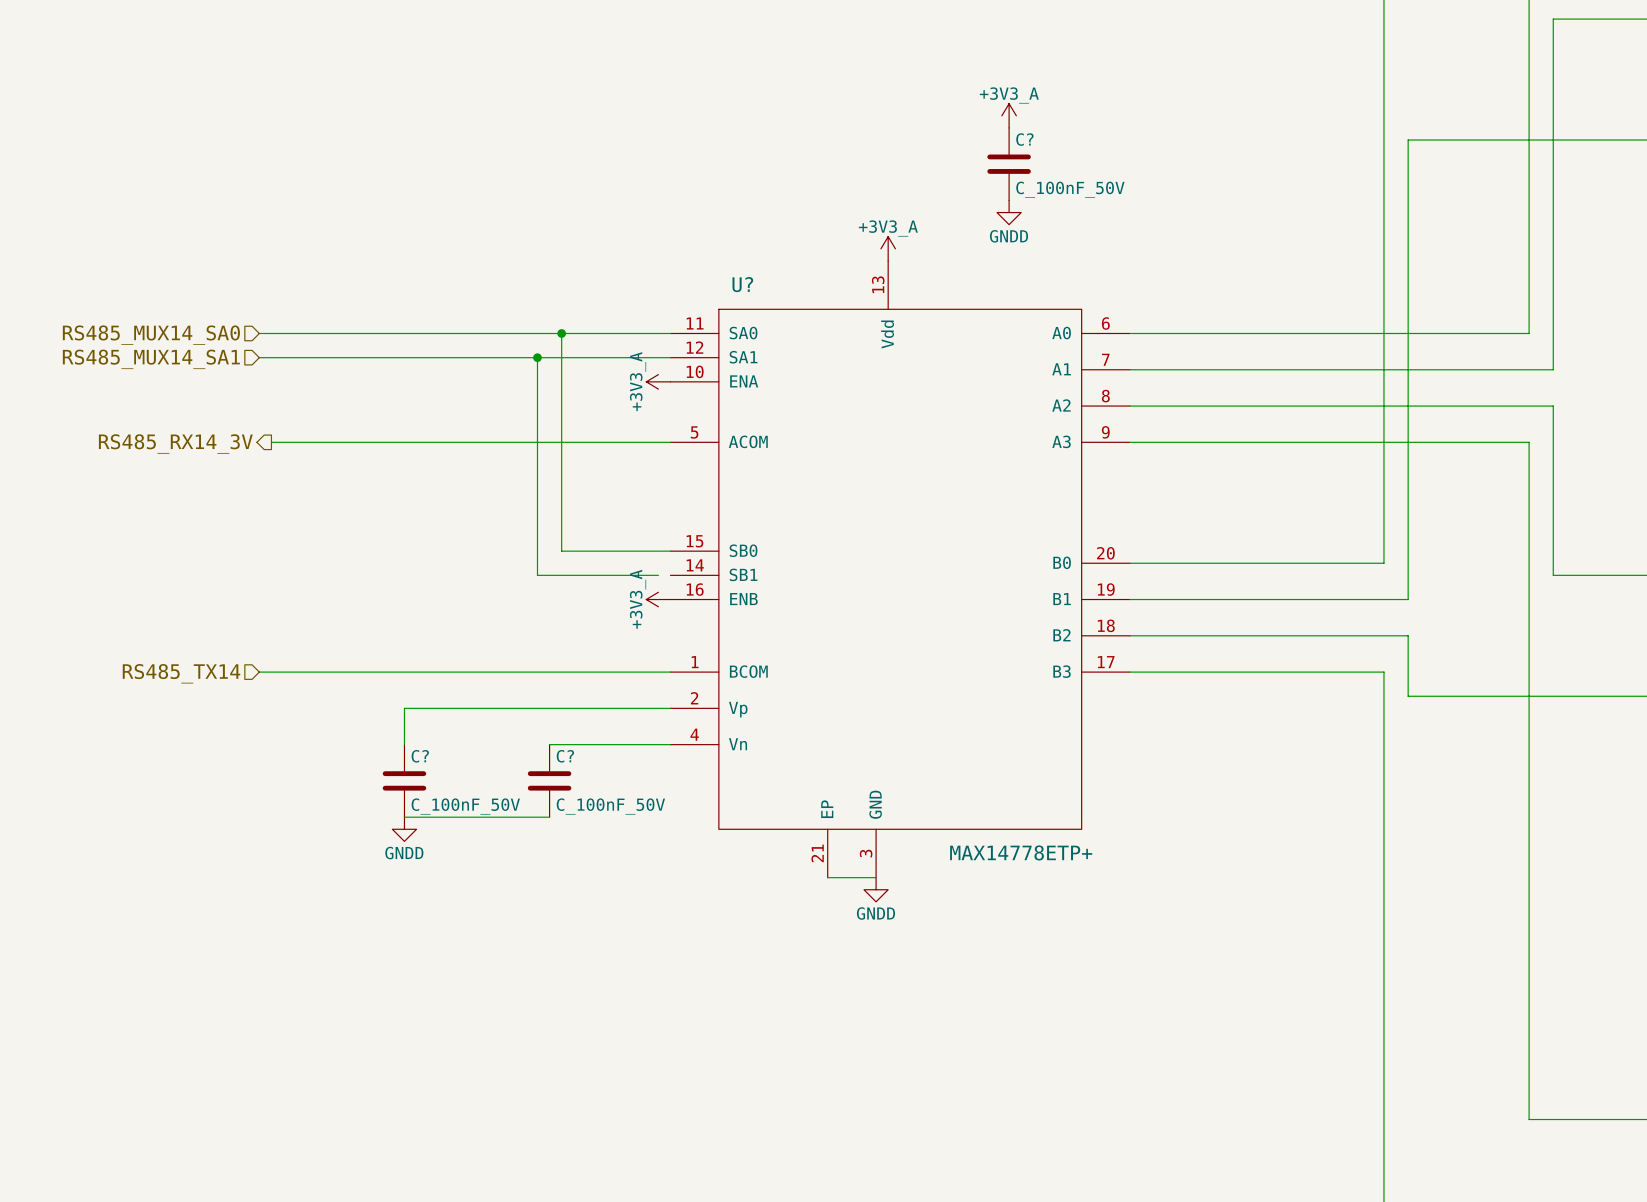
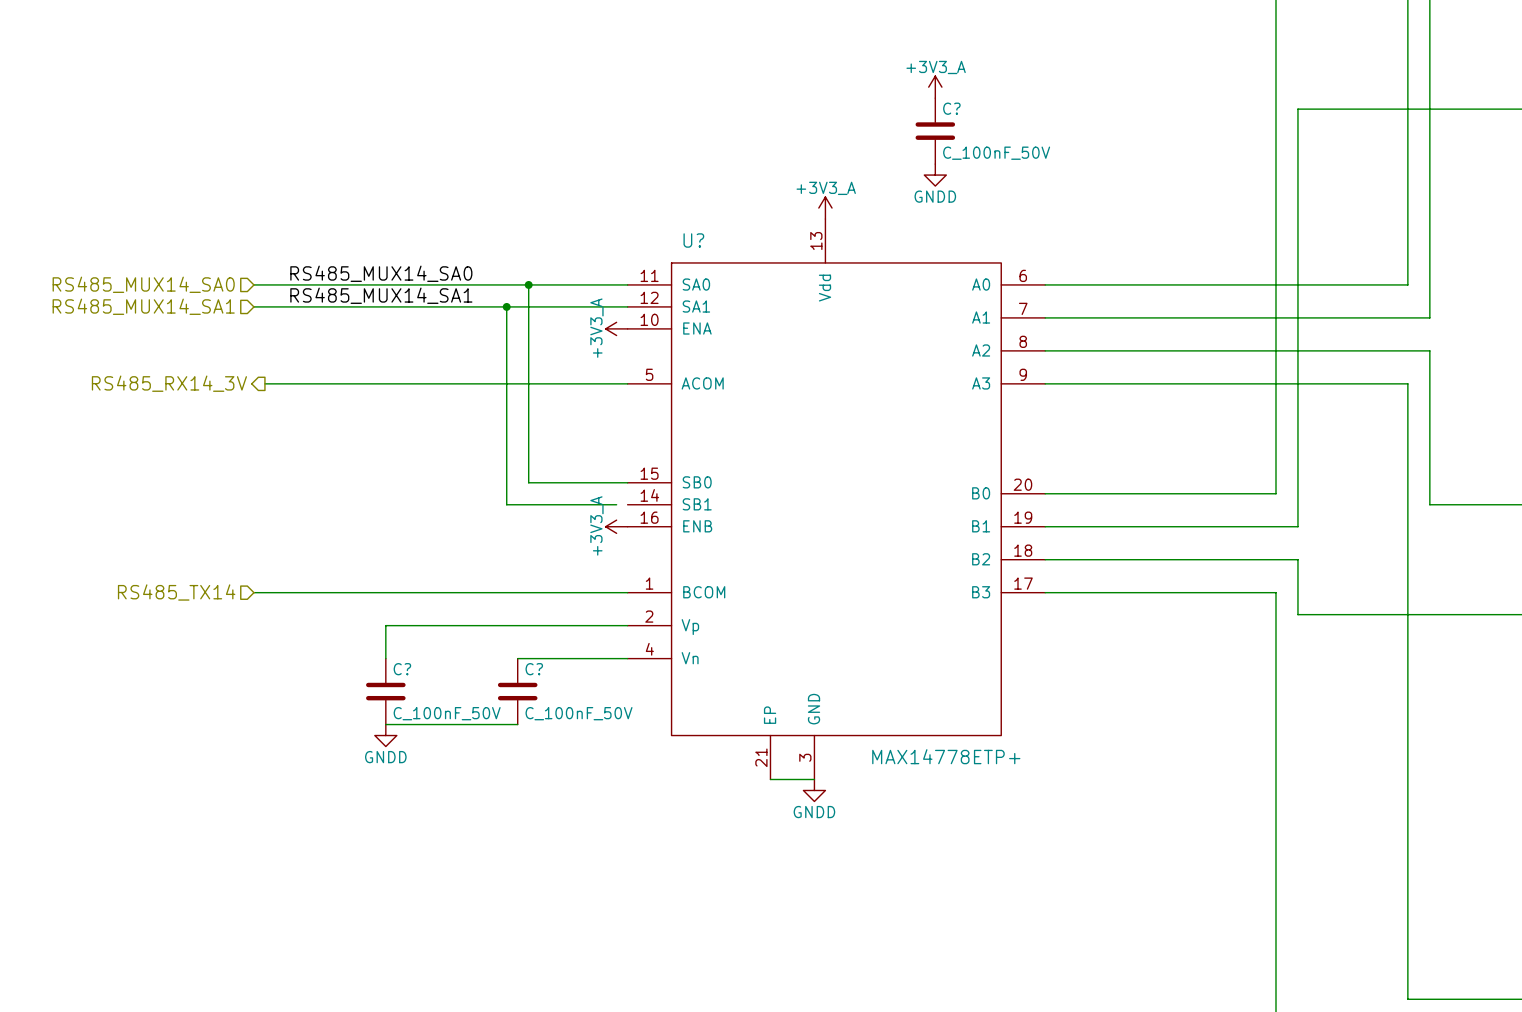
label: none -> RS485_MUX14_SA0 (381, 273)
label: none -> RS485_MUX14_SA1 (381, 295)

